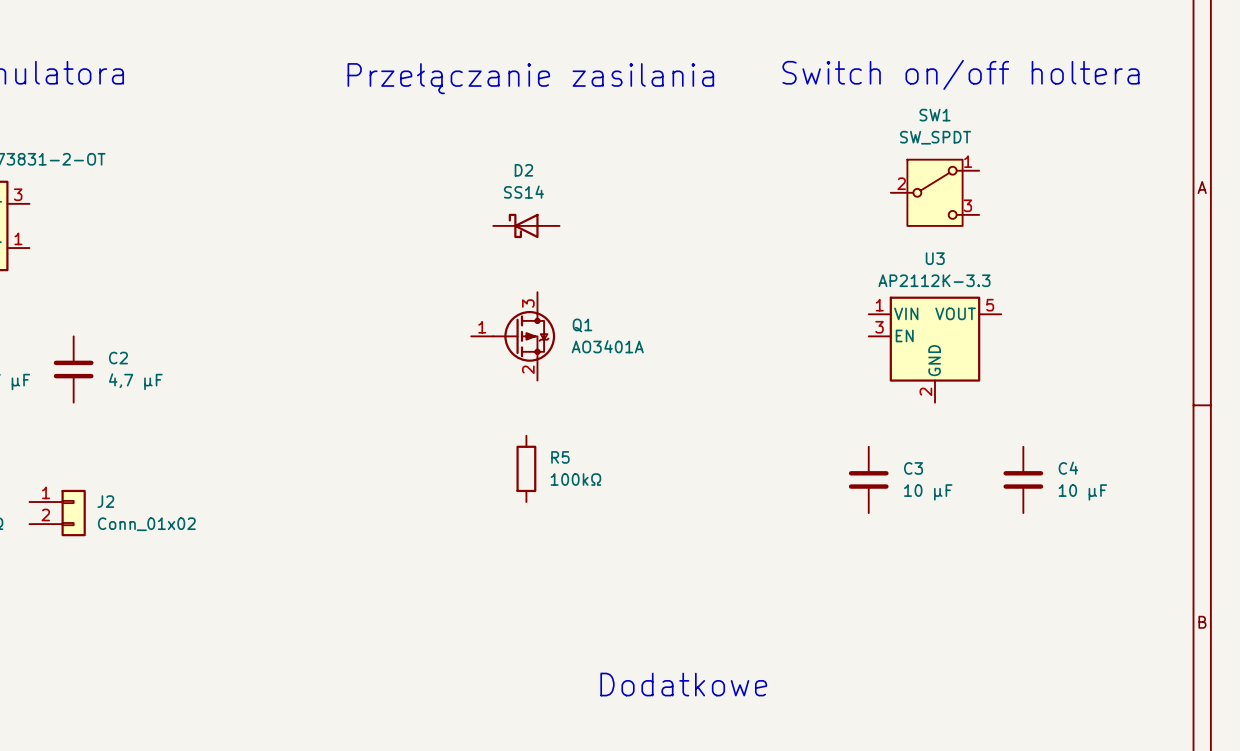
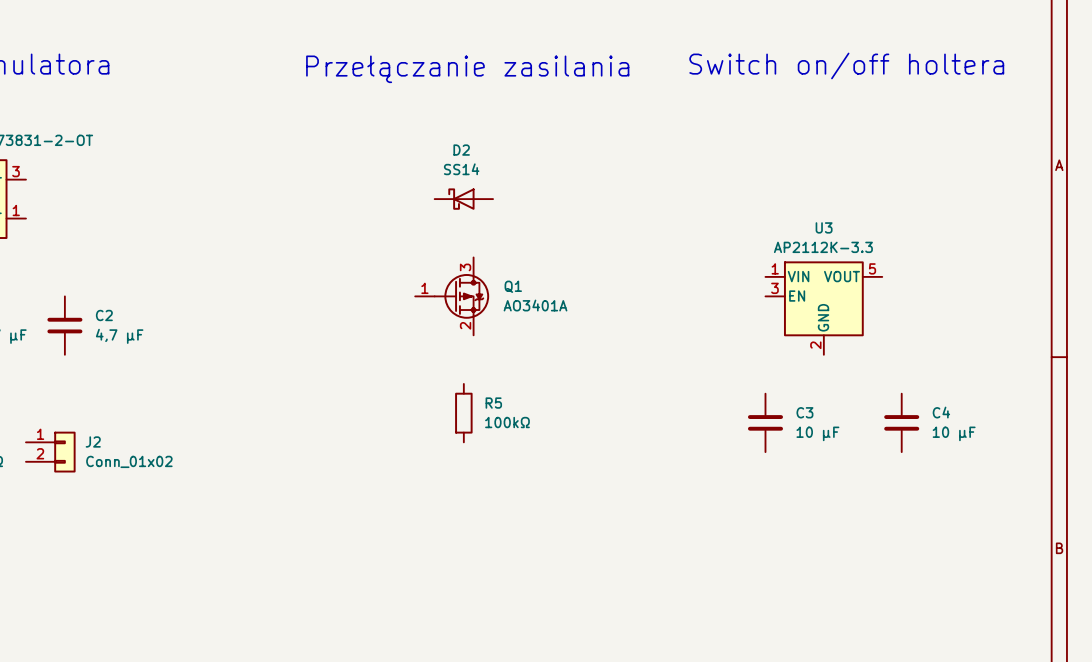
SW1: SW_SPDT (935, 192) -> none
text: Dodatkowe (683, 684) -> none

